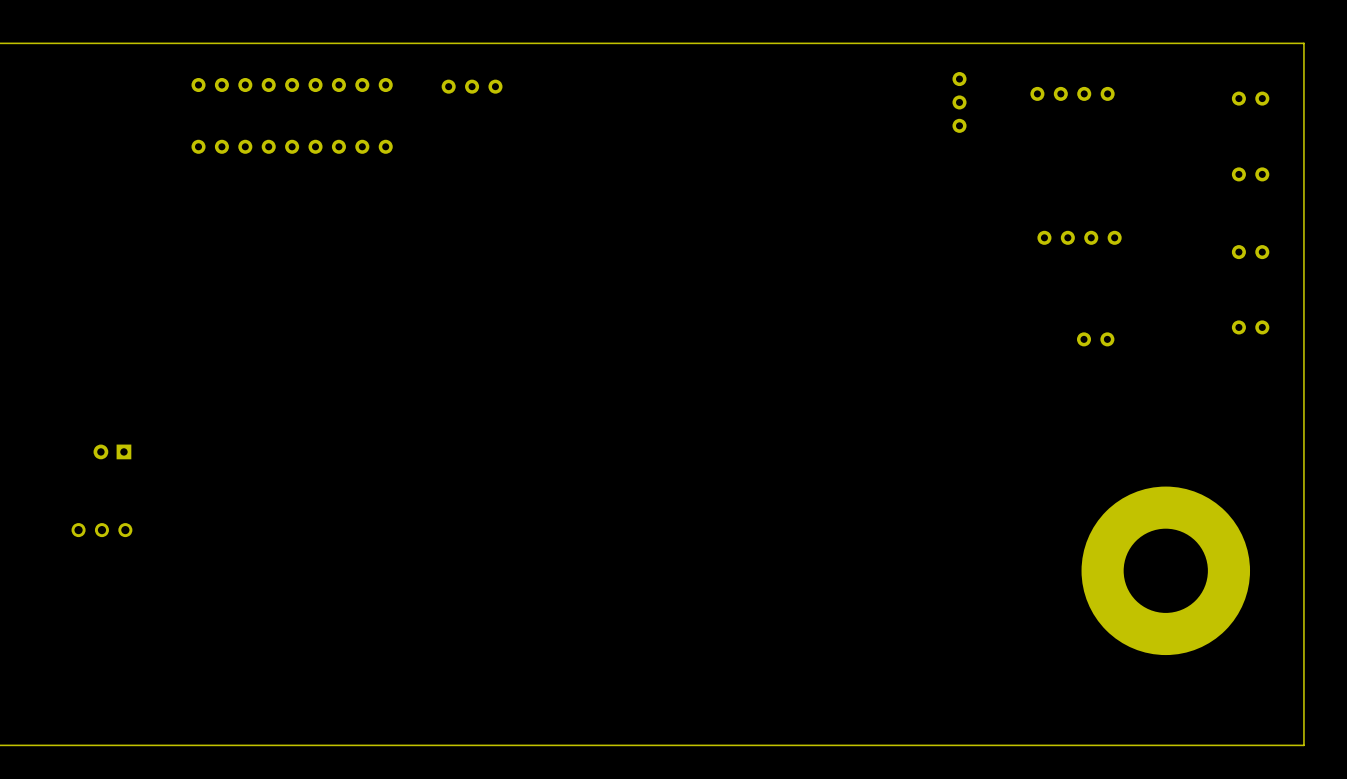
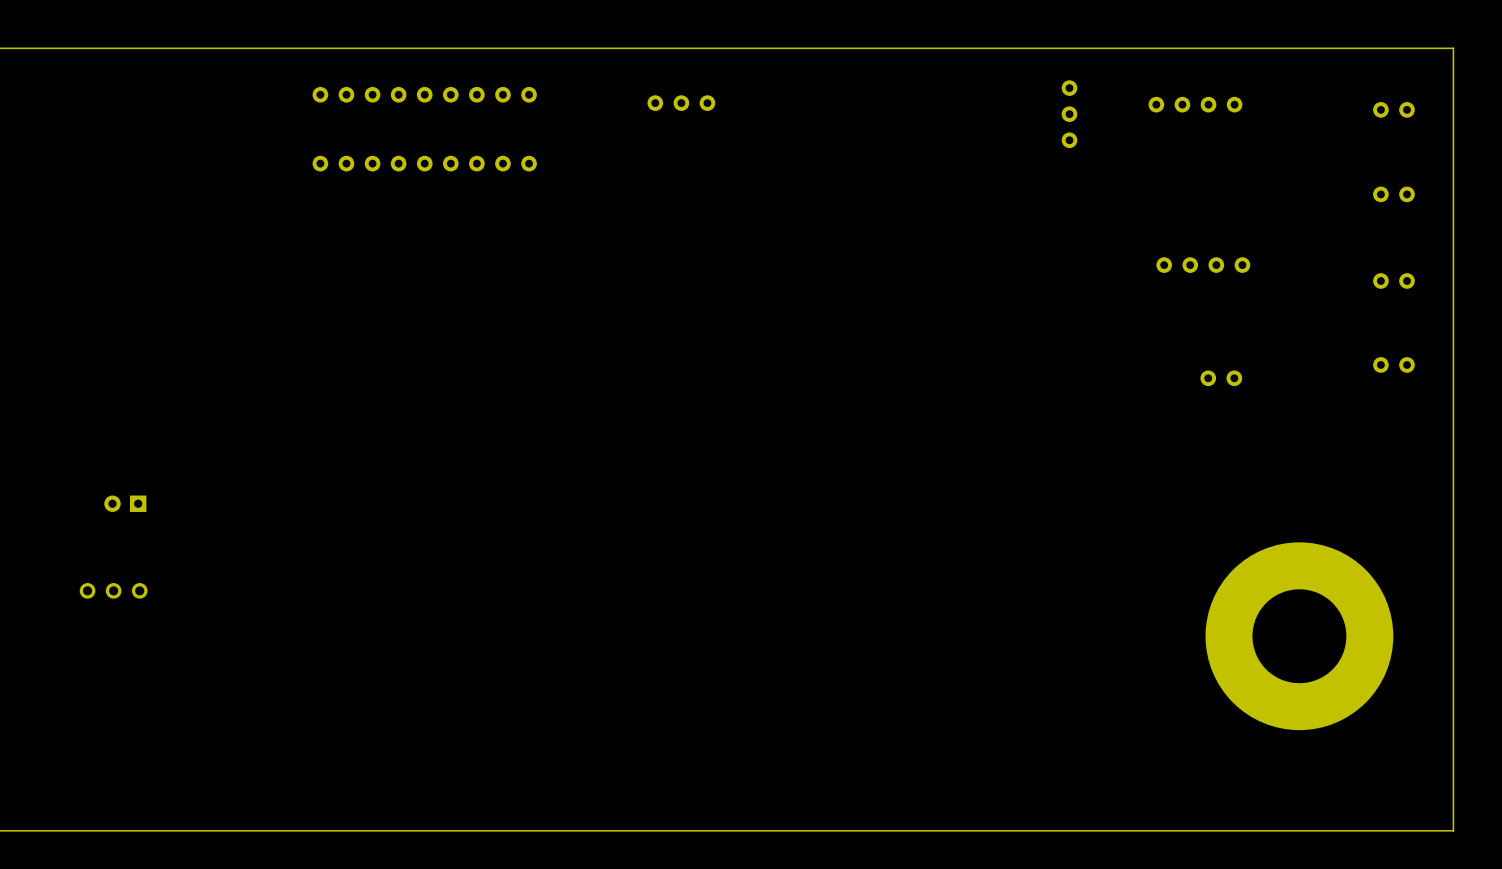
part: (292, 85) -> none
part: none -> (424, 94)
part position: (472, 86) -> (681, 103)
part: (292, 146) -> none
part: none -> (424, 163)

